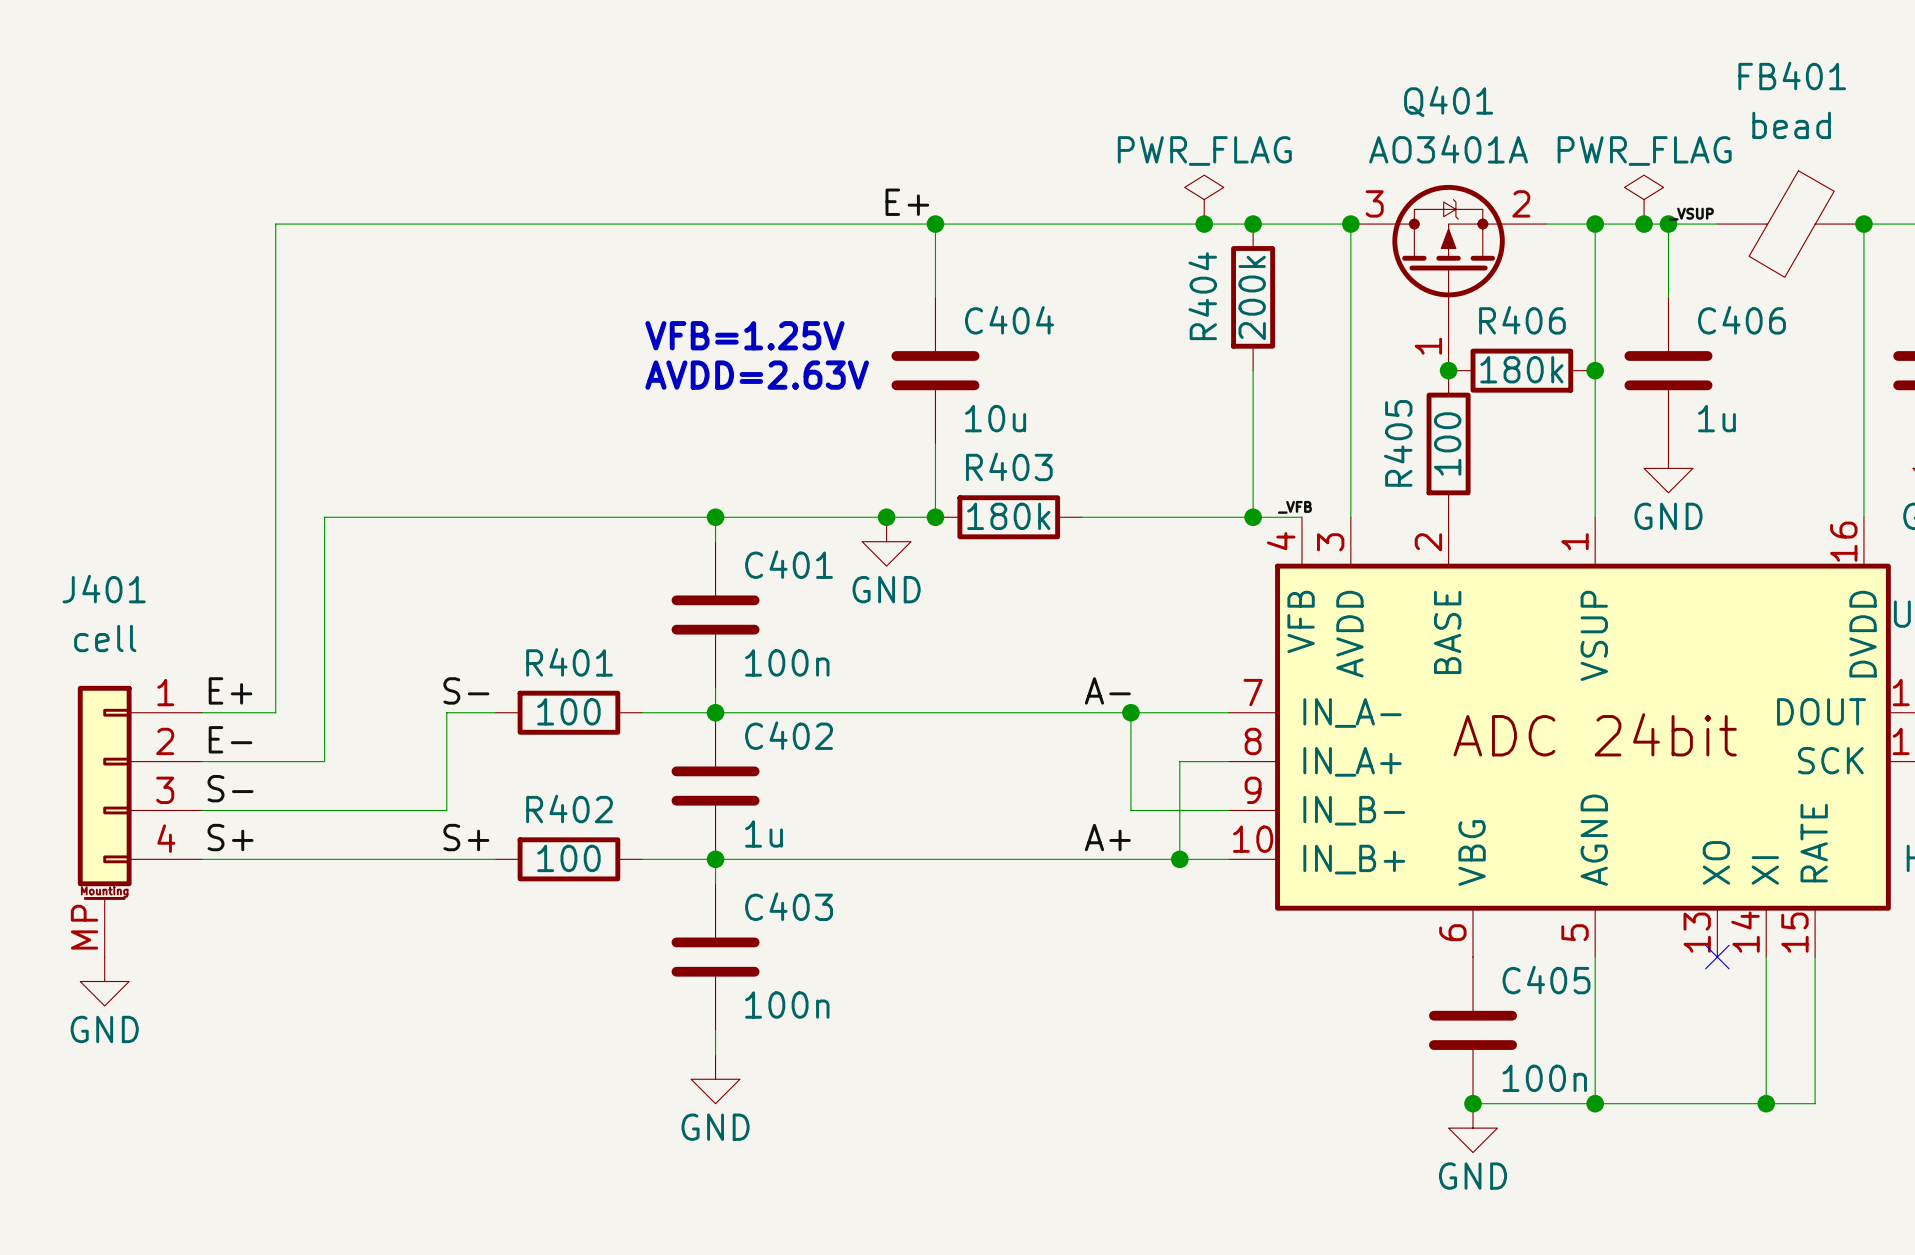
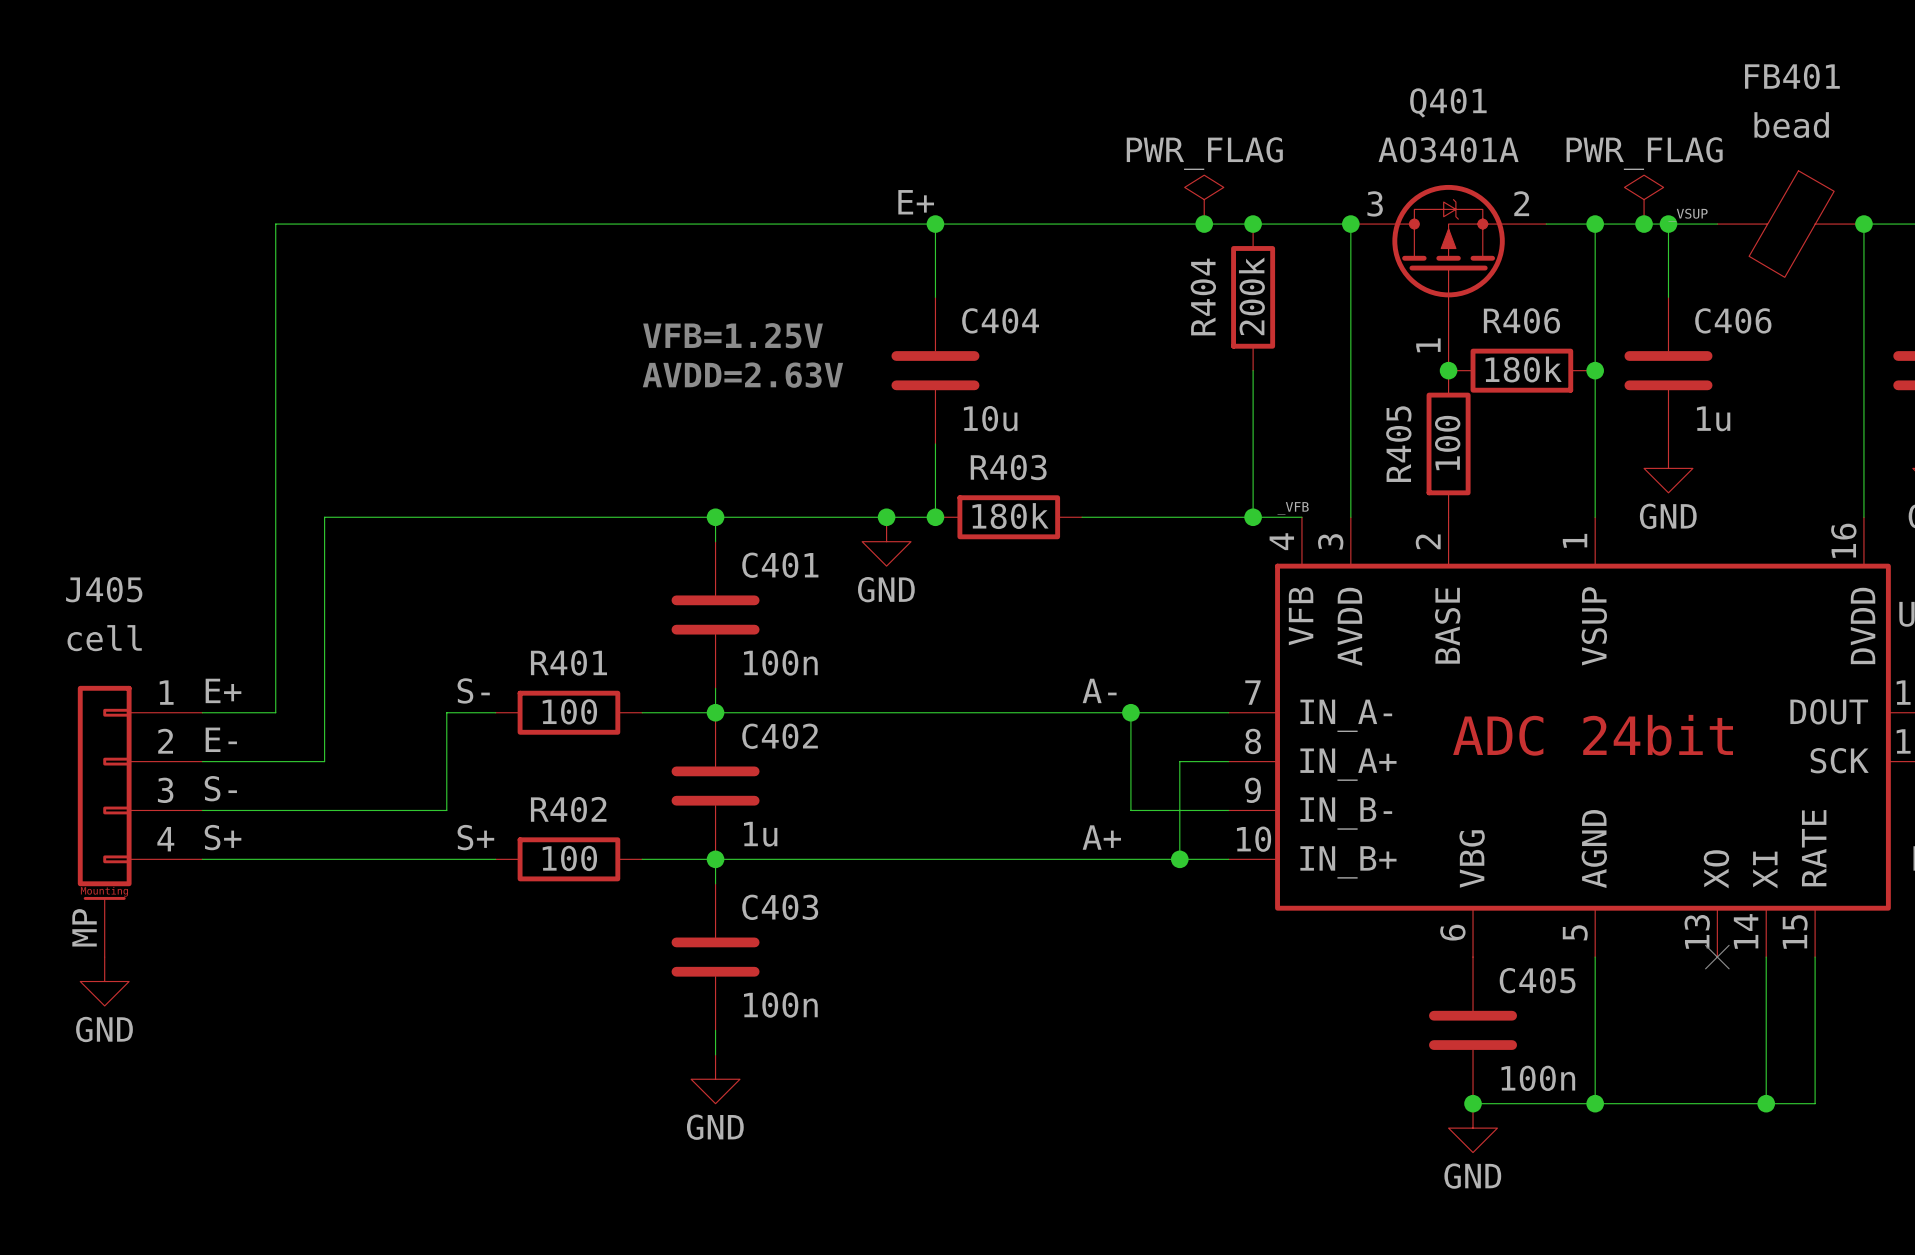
J401 name: J401 (104, 589) -> J405 (104, 589)

